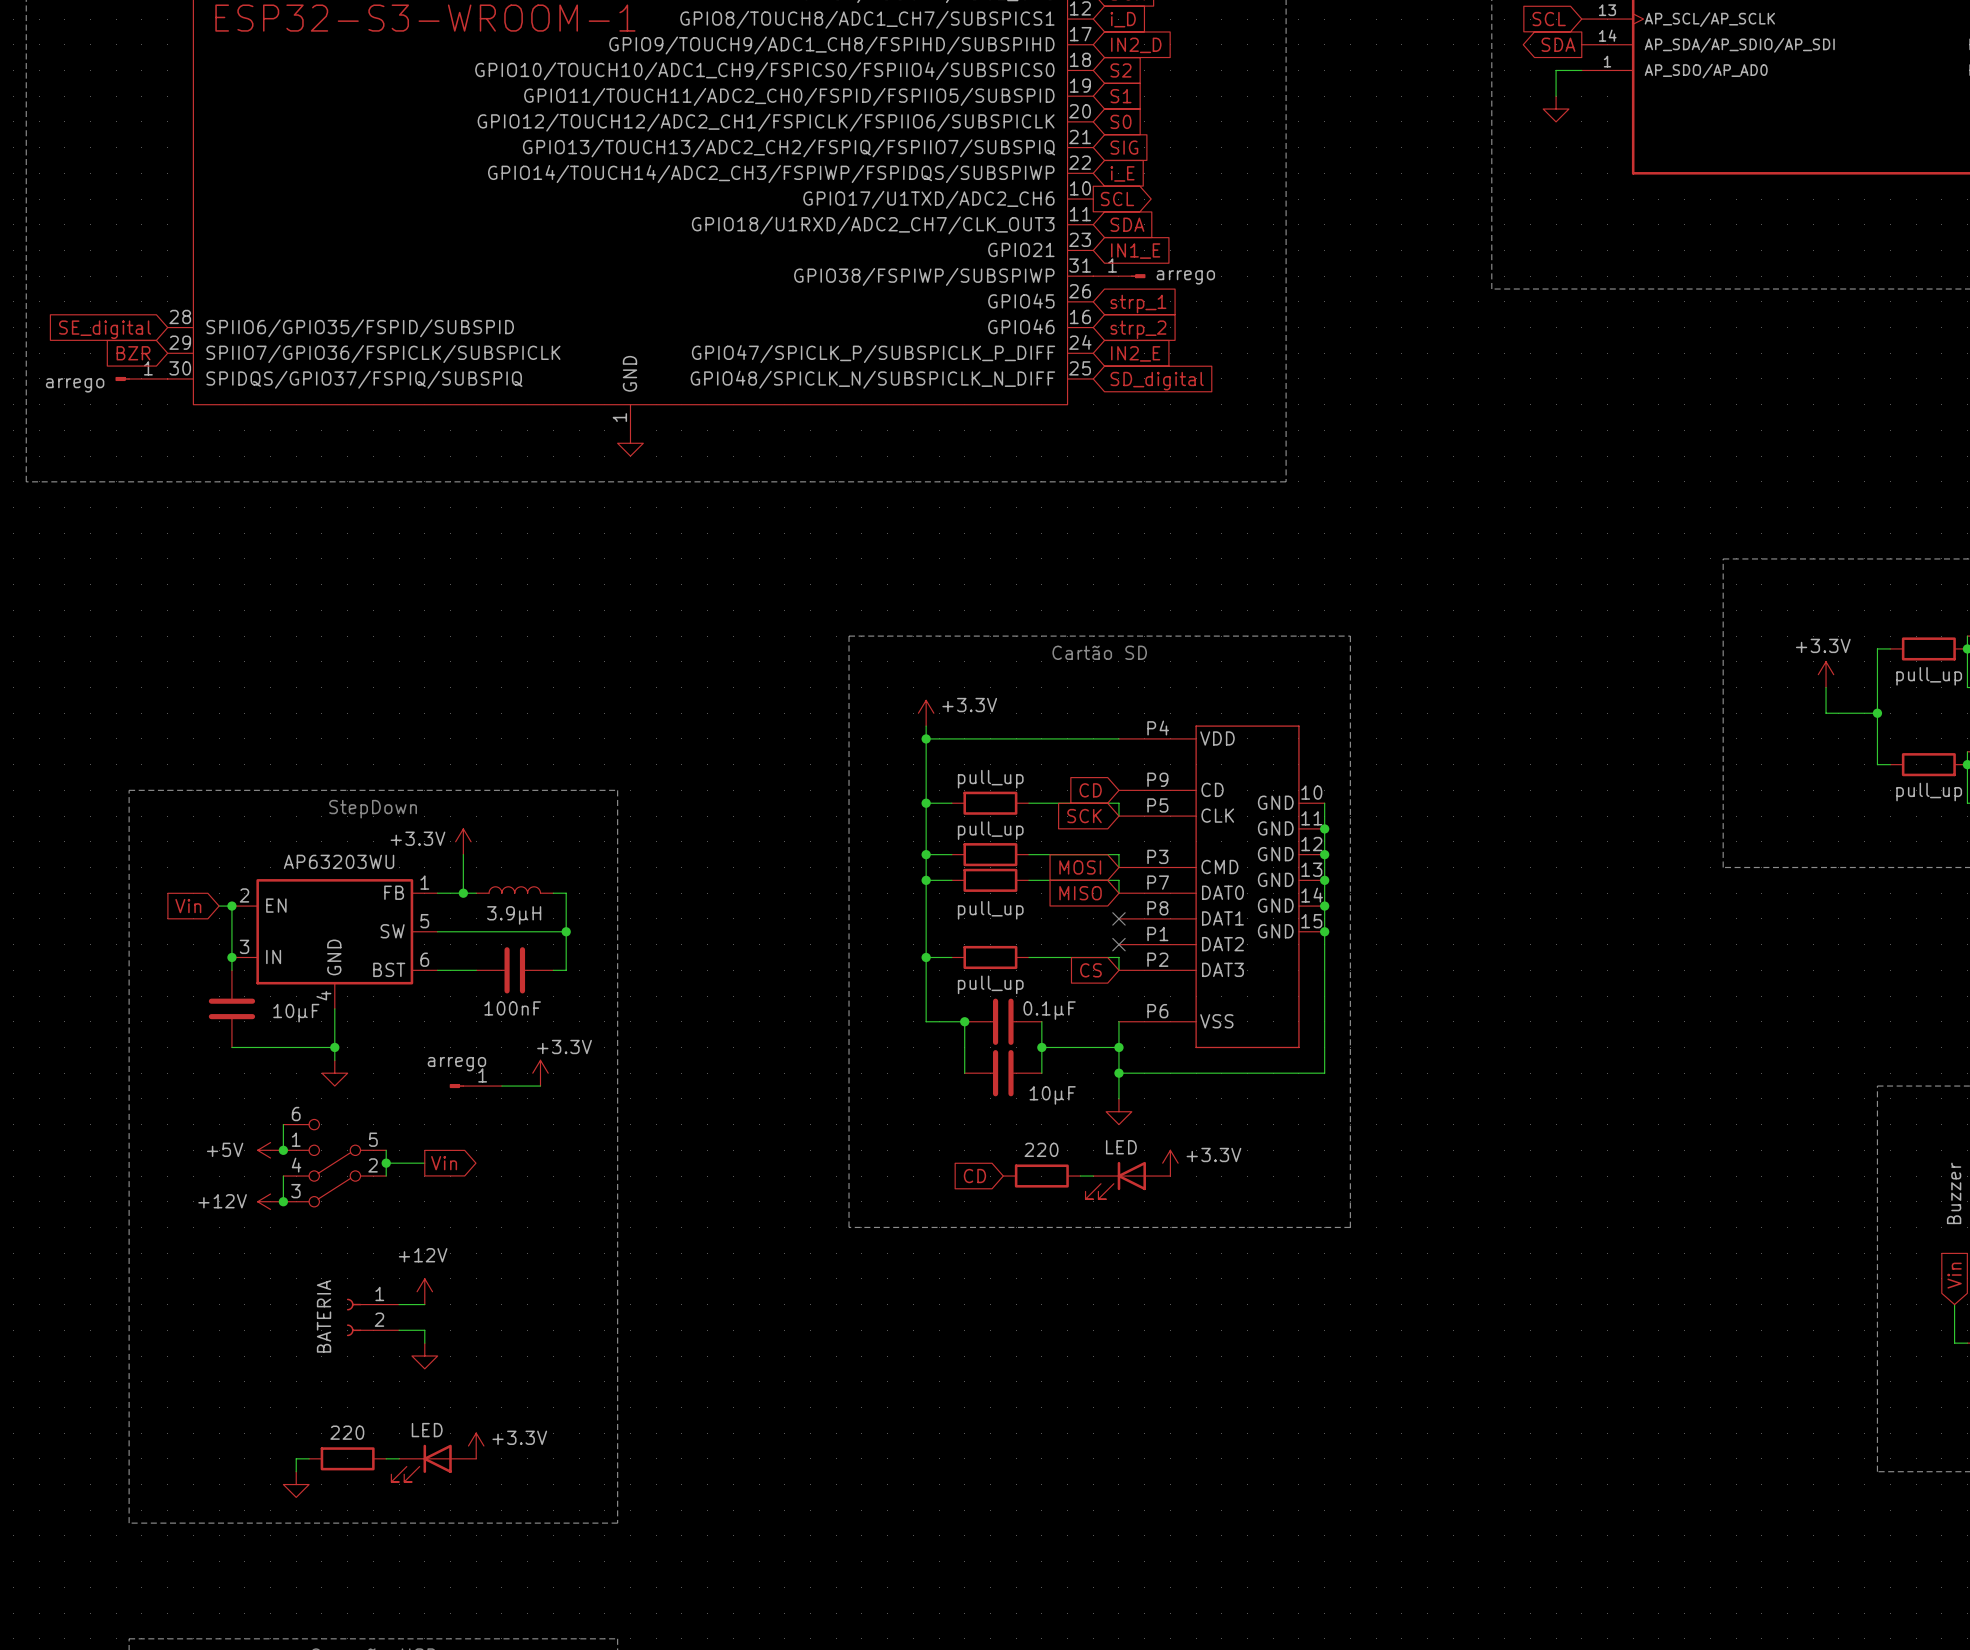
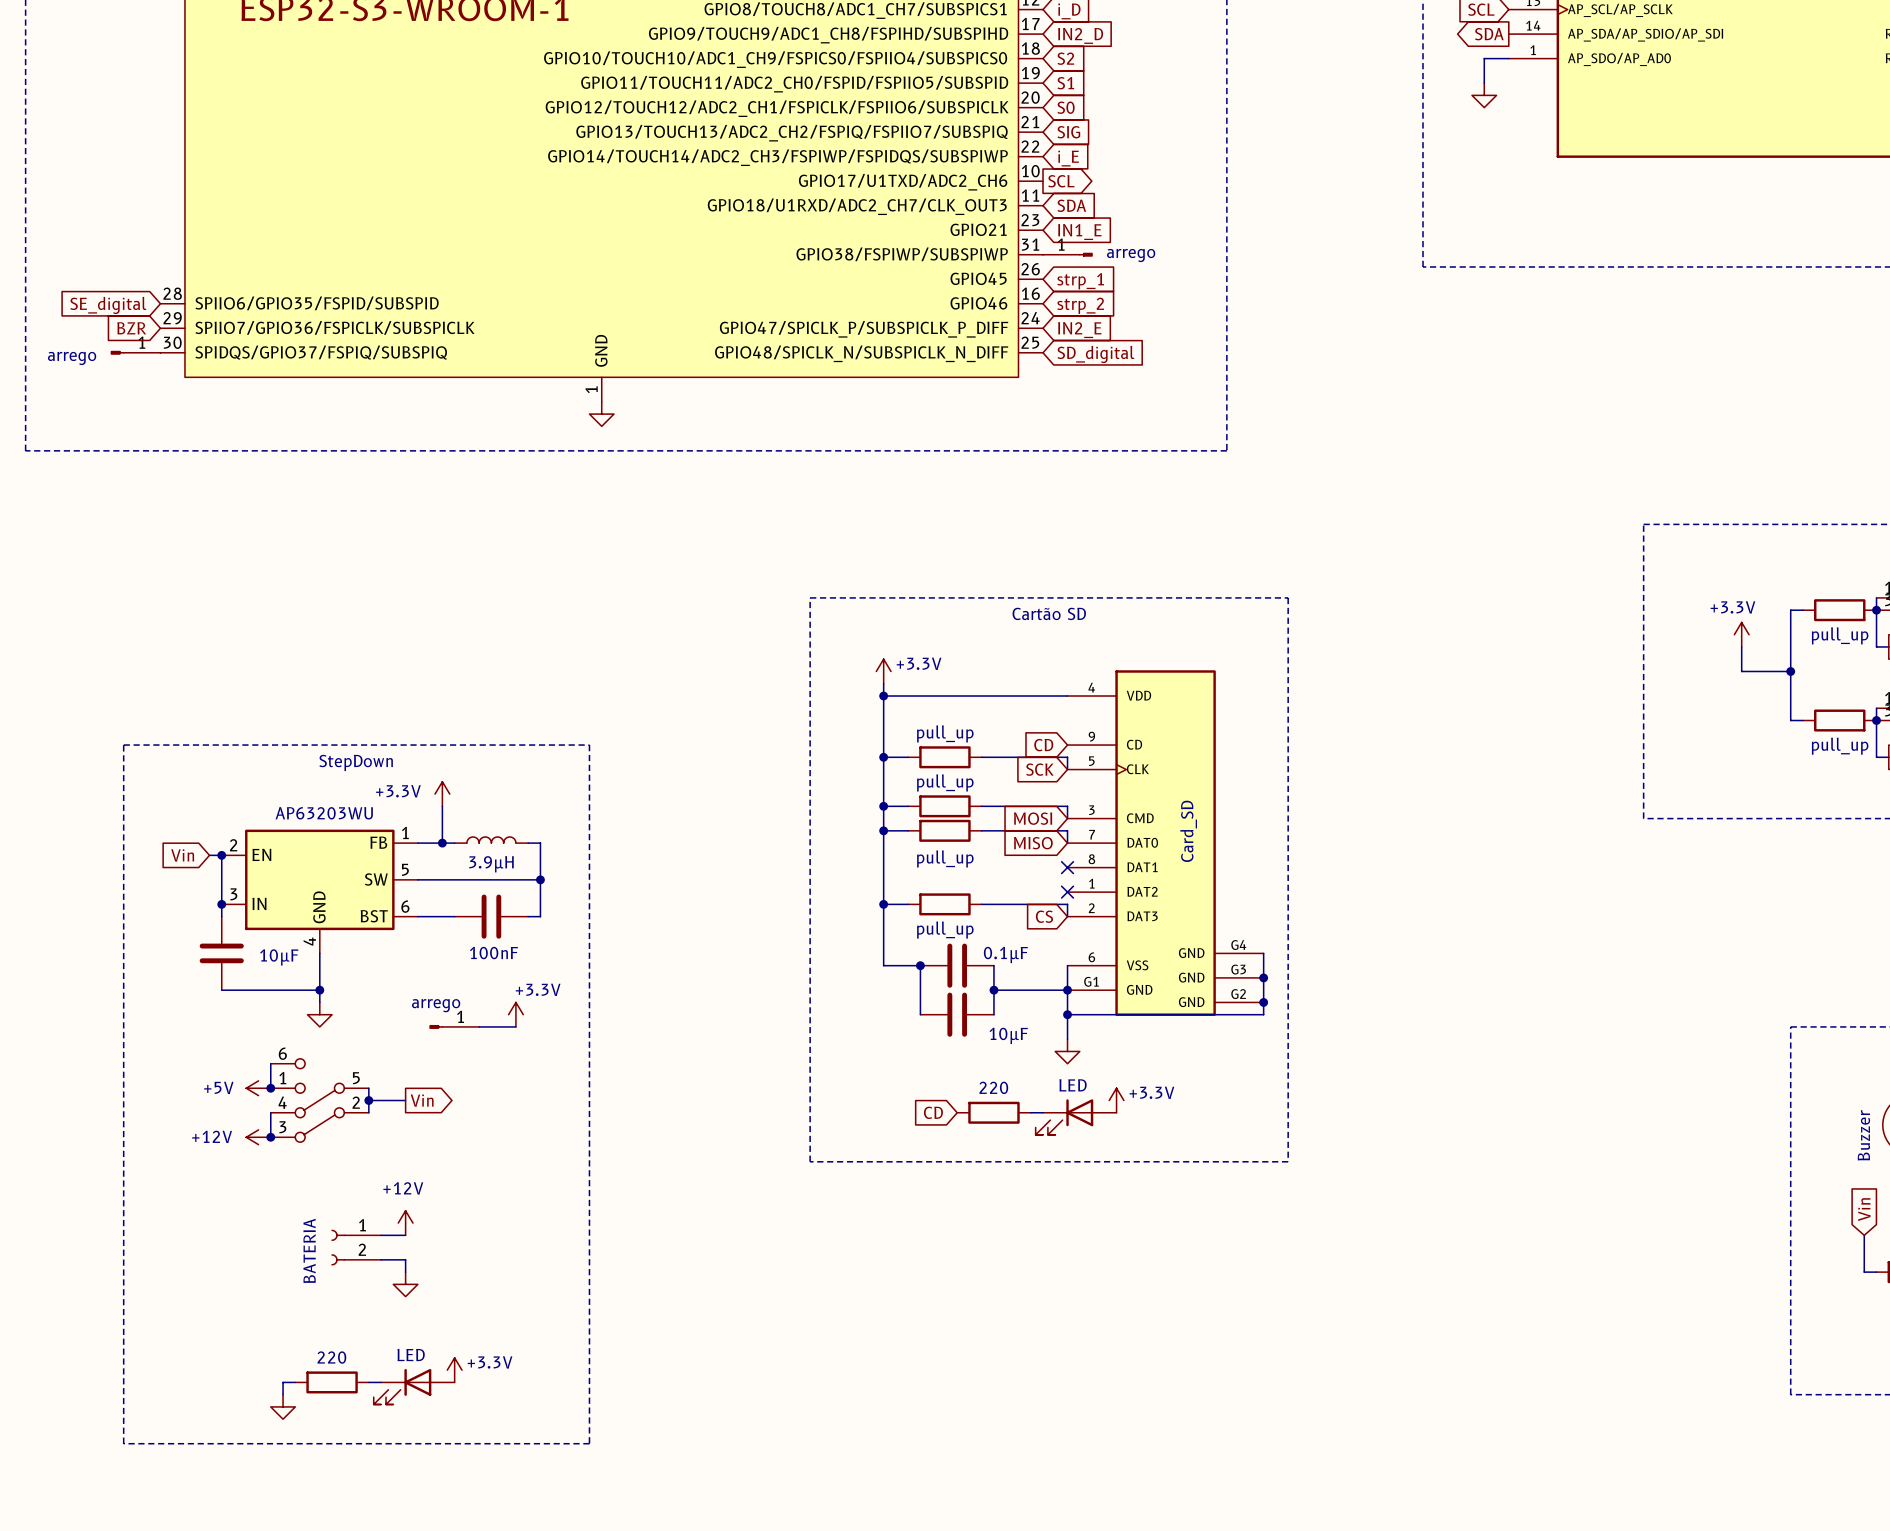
part symbol: [1118, 725, 1325, 1049] -> [1067, 670, 1264, 1016]
wire: (1324, 803) (1324, 1008) -> none
junction: (1324, 828) -> none
junction: (1324, 854) -> none
part value: none -> Card_SD (1188, 831)
junction: (1324, 880) -> none
junction: (1324, 906) -> none
junction: (1324, 931) -> none
junction: none -> (1263, 977)
junction: none -> (1263, 1002)

